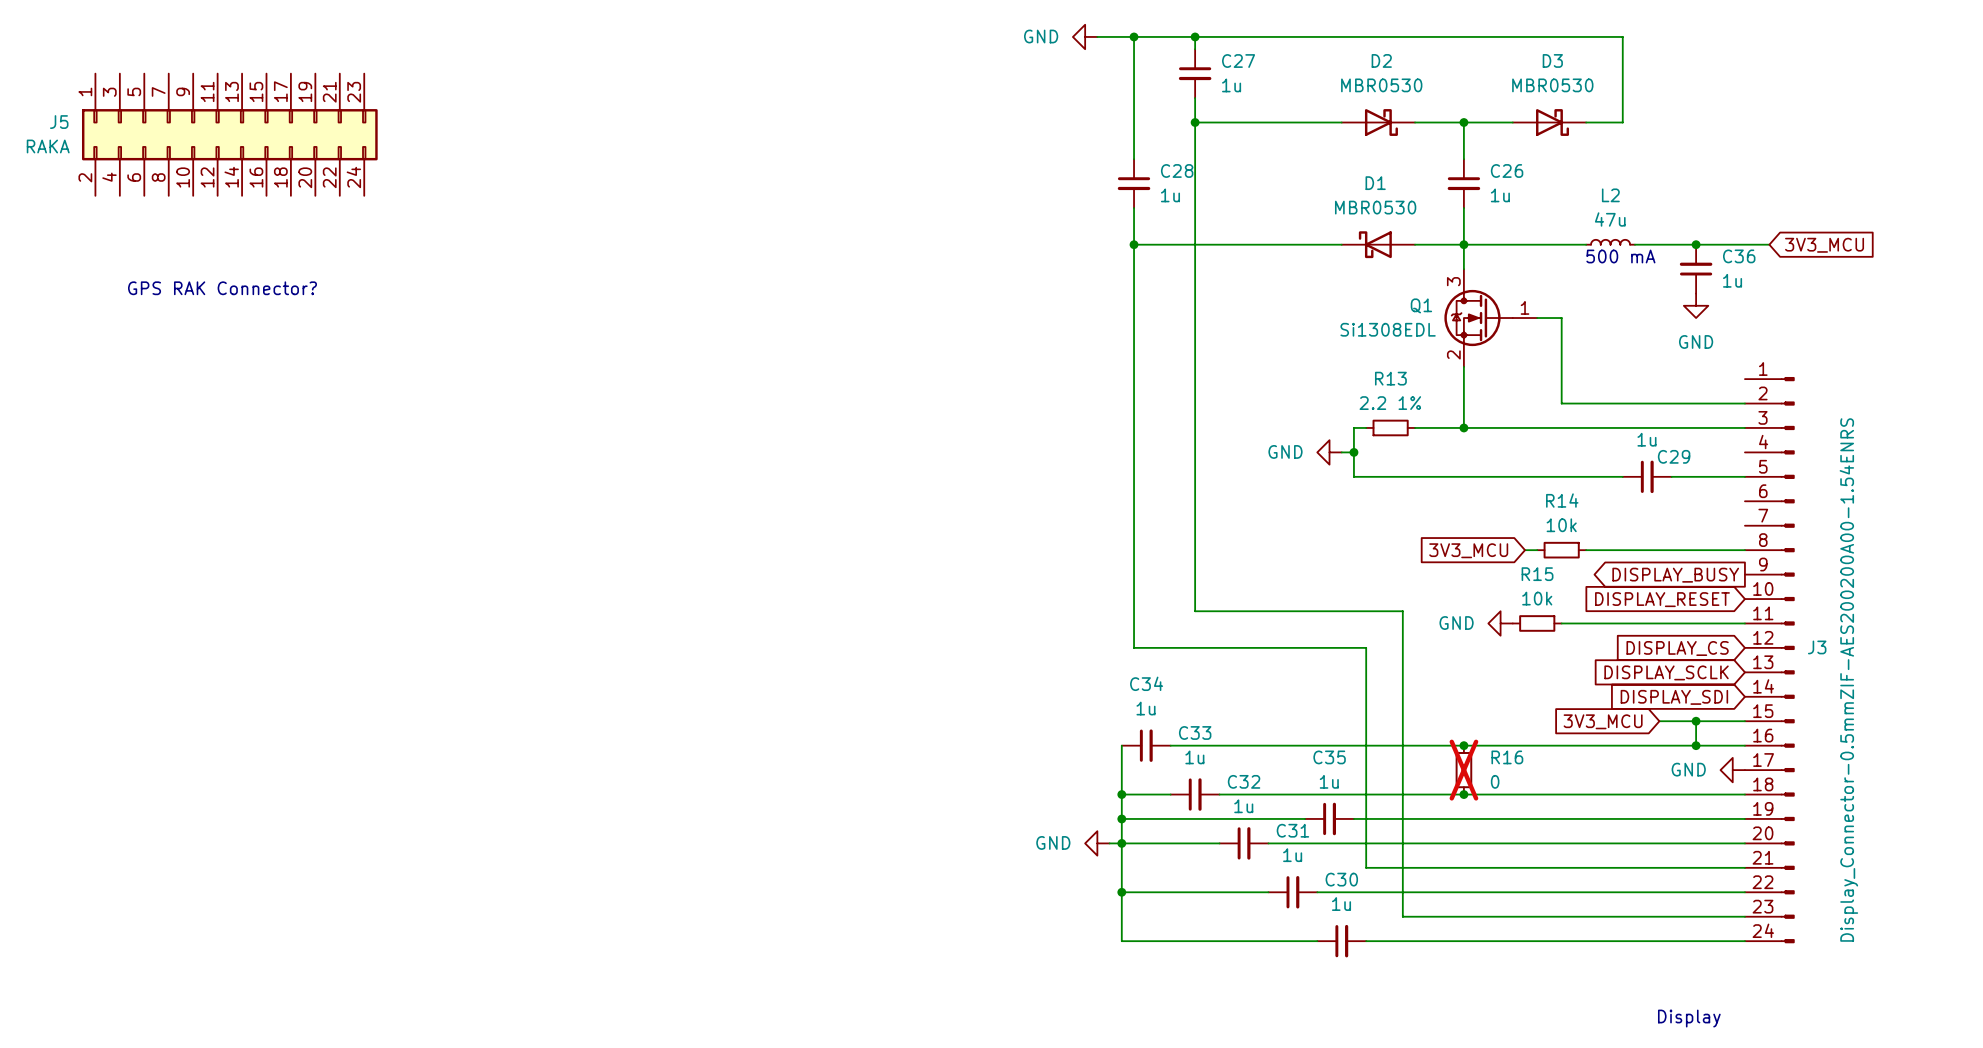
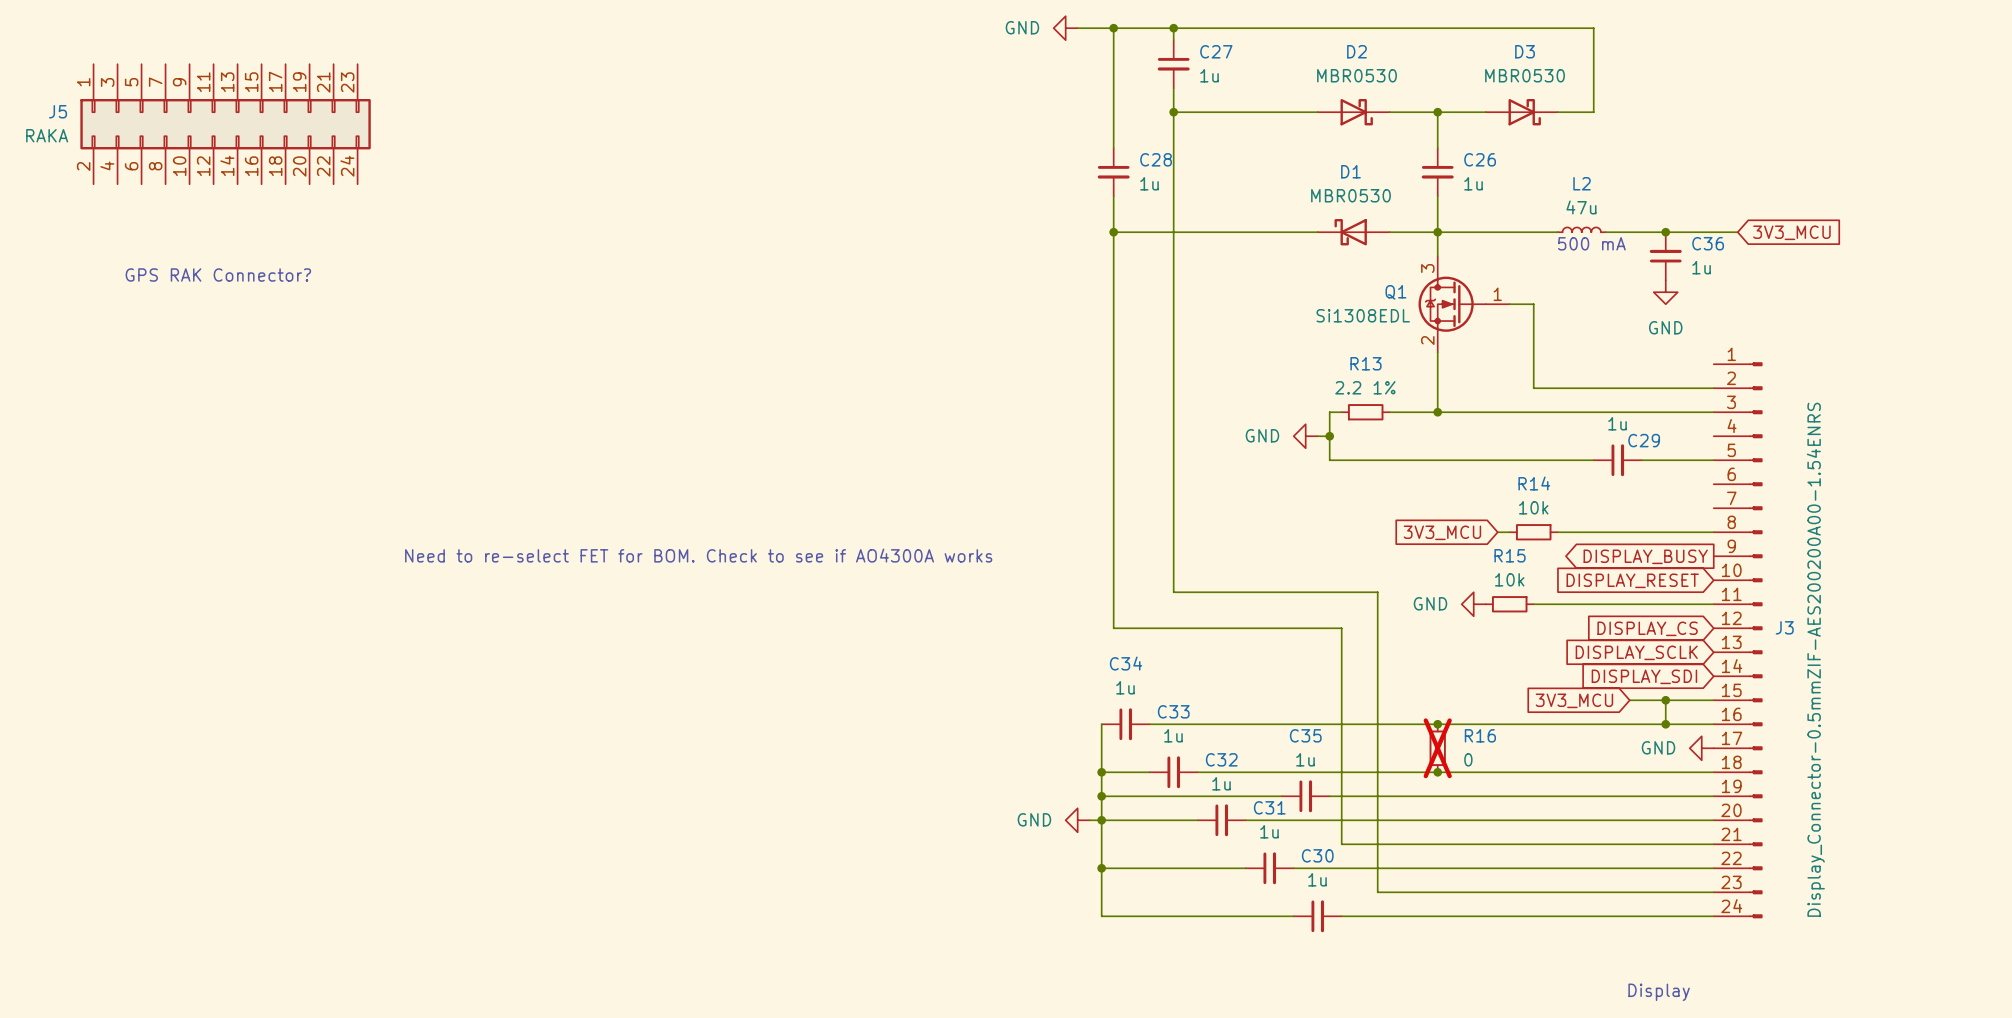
text: none -> Need to re-select FET for BOM. Check to see if AO4300A works (698, 555)

